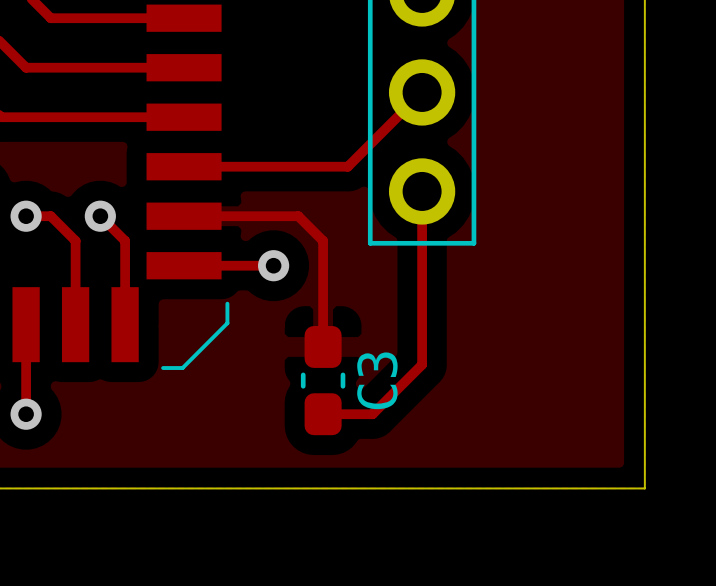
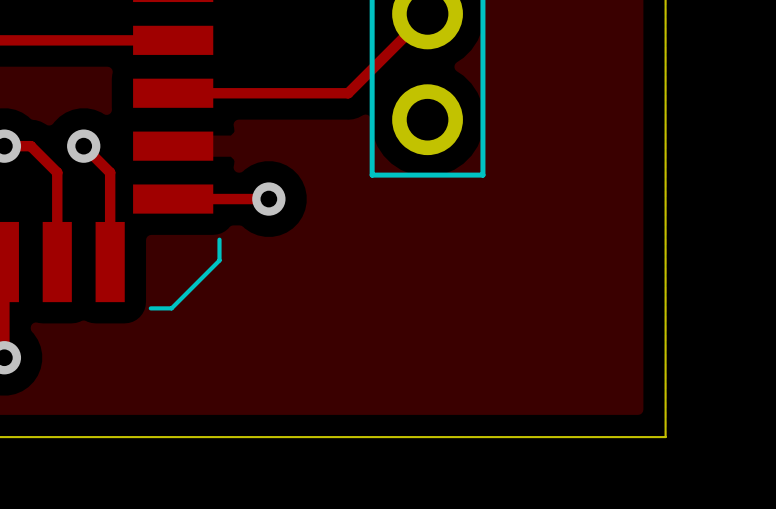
track: (422, 191) (422, 364) (372, 414) (323, 414) -> none
track: (184, 216) (298, 216) (323, 240) (323, 346) -> none
C3: (323, 380) -> none

